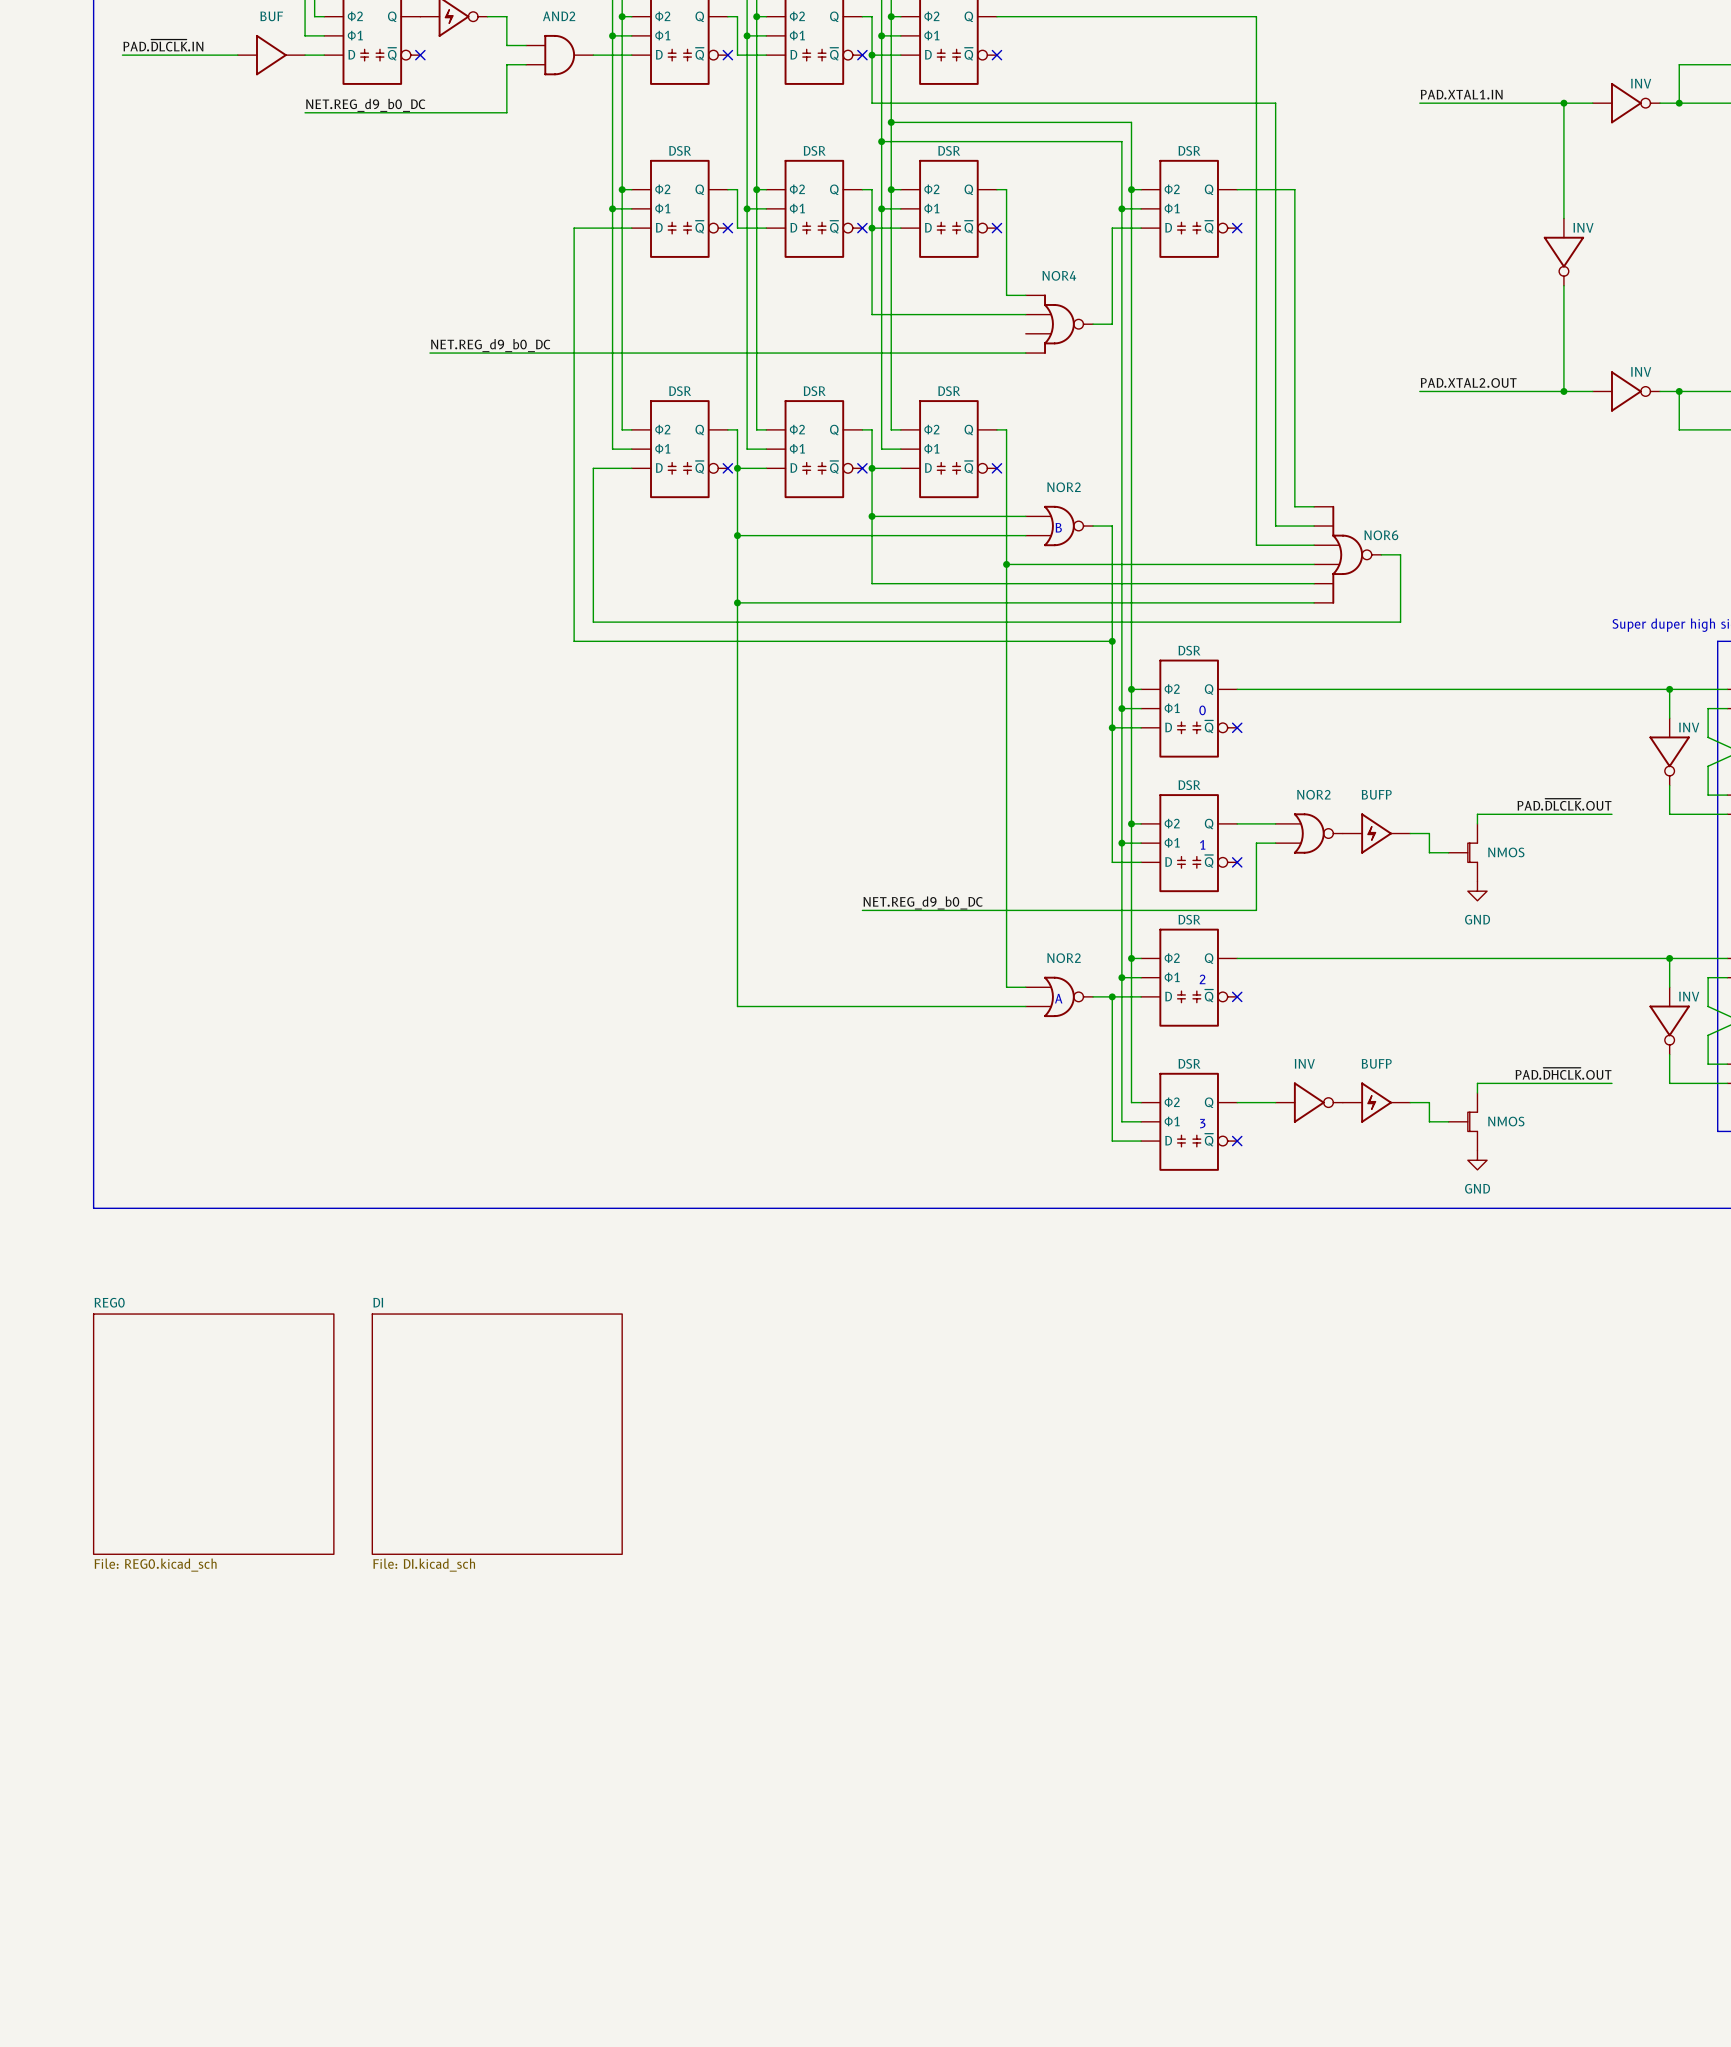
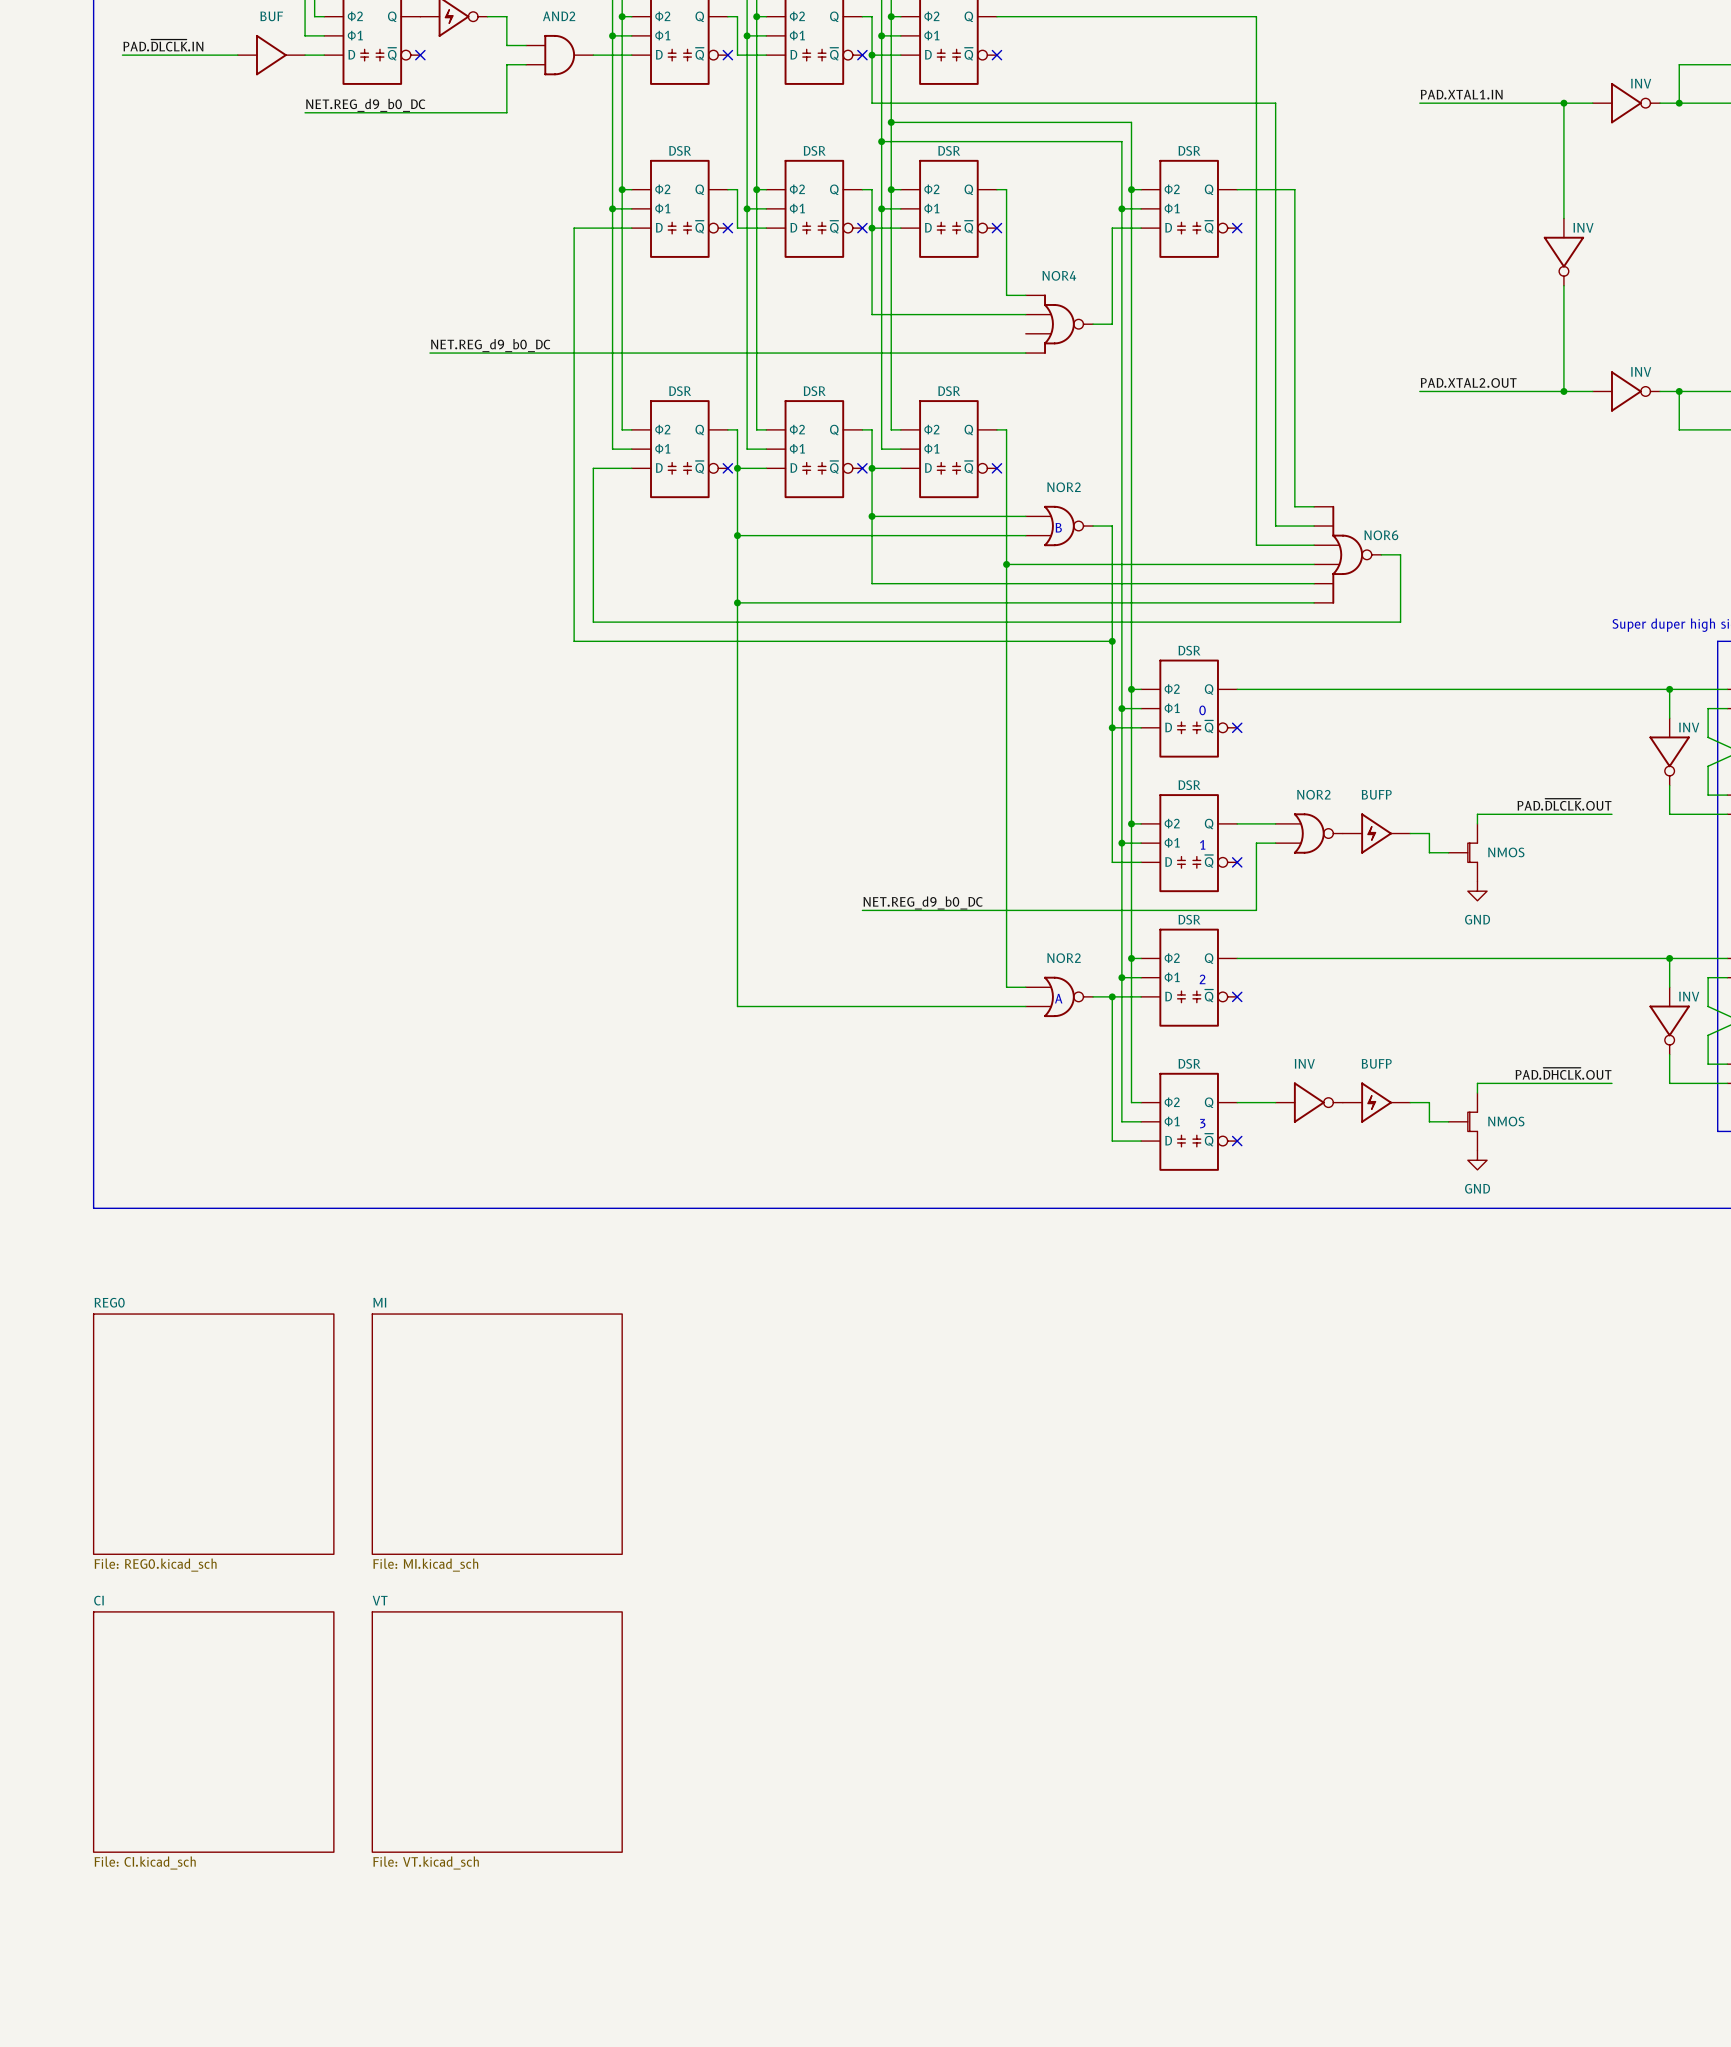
sheet DI name: DI (378, 1302) -> MI (379, 1302)
sheet DI value: File: DI.kicad_sch (424, 1565) -> File: MI.kicad_sch (425, 1565)
sheet CI: none -> File: CI.kicad_sch (213, 1732)
sheet VT: none -> File: VT.kicad_sch (497, 1732)

